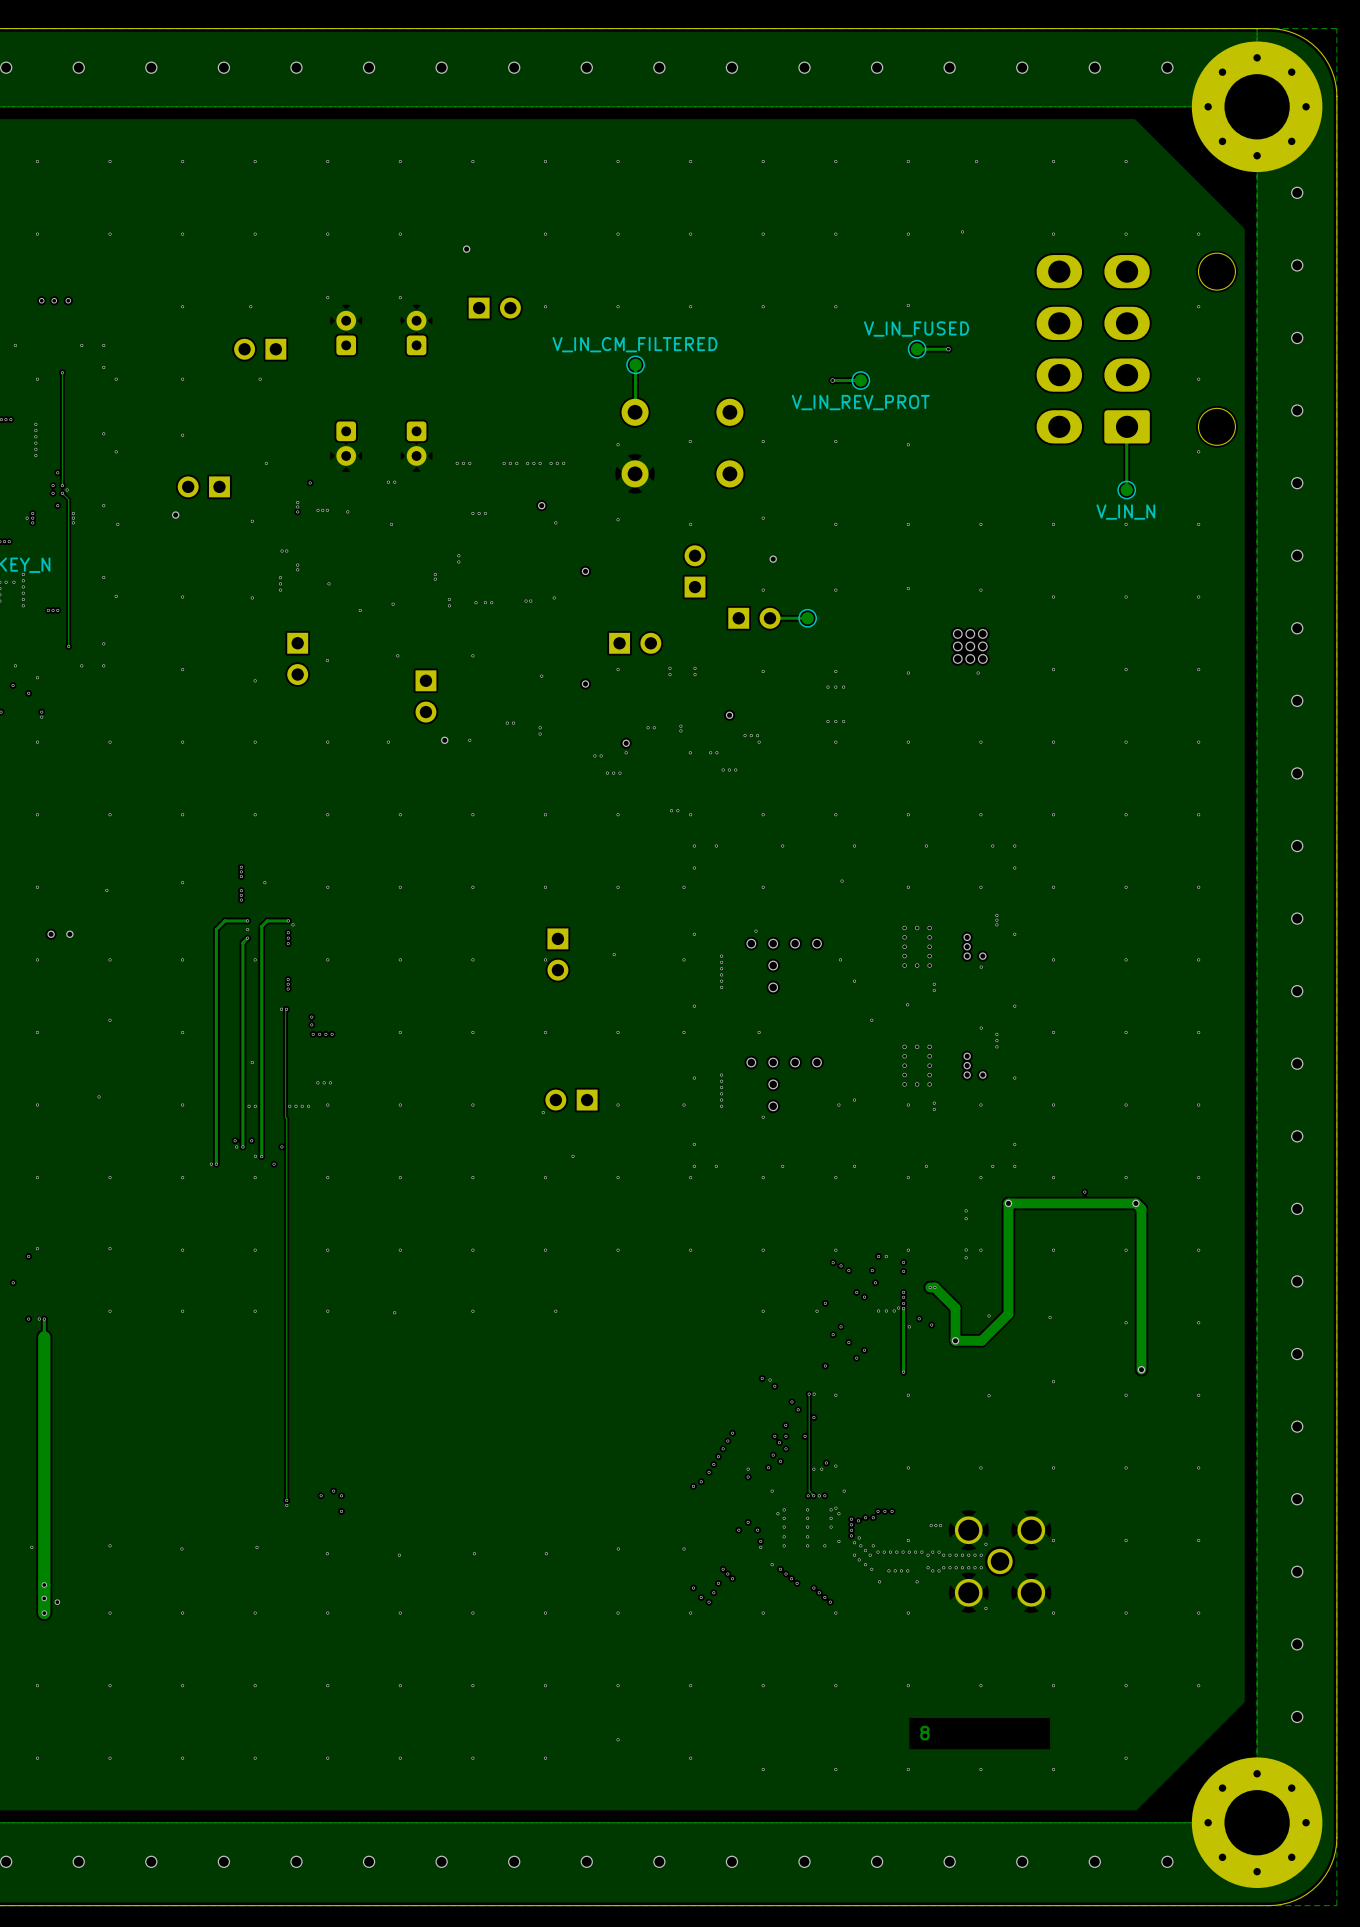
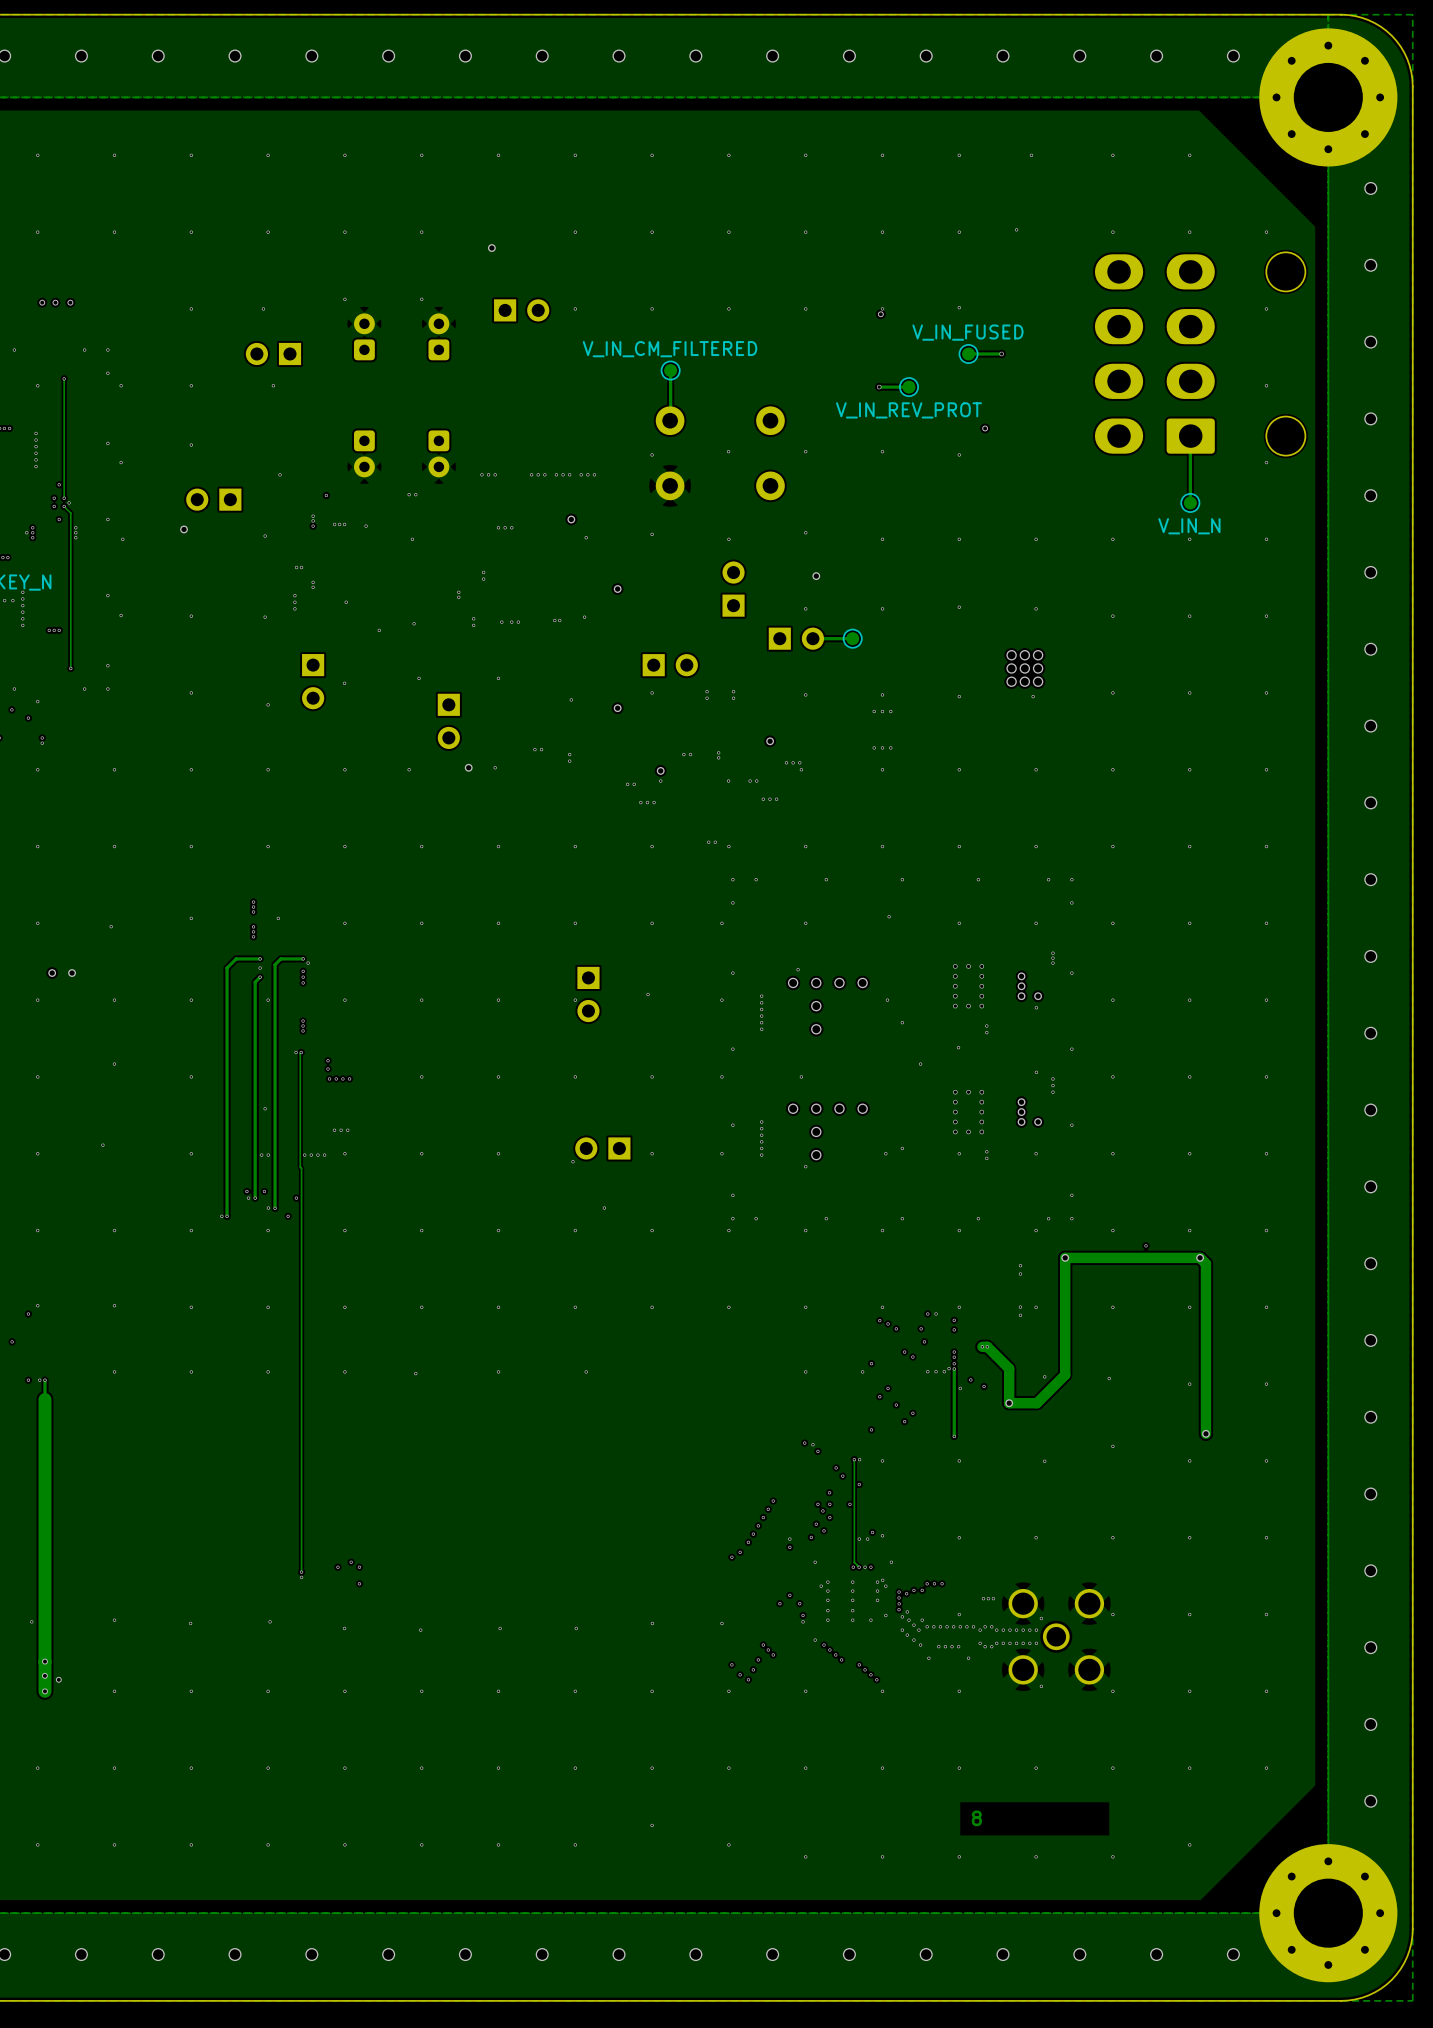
via: none -> (880, 314)
via: none -> (985, 428)

